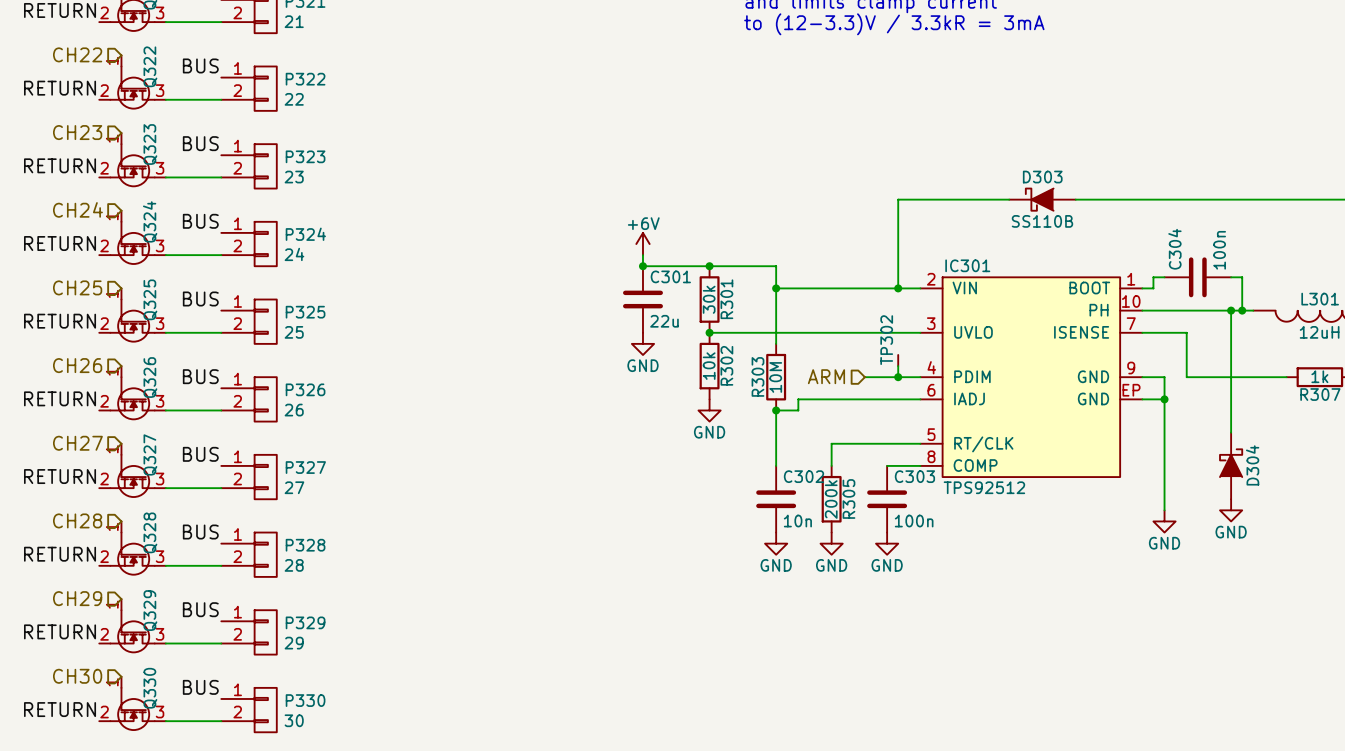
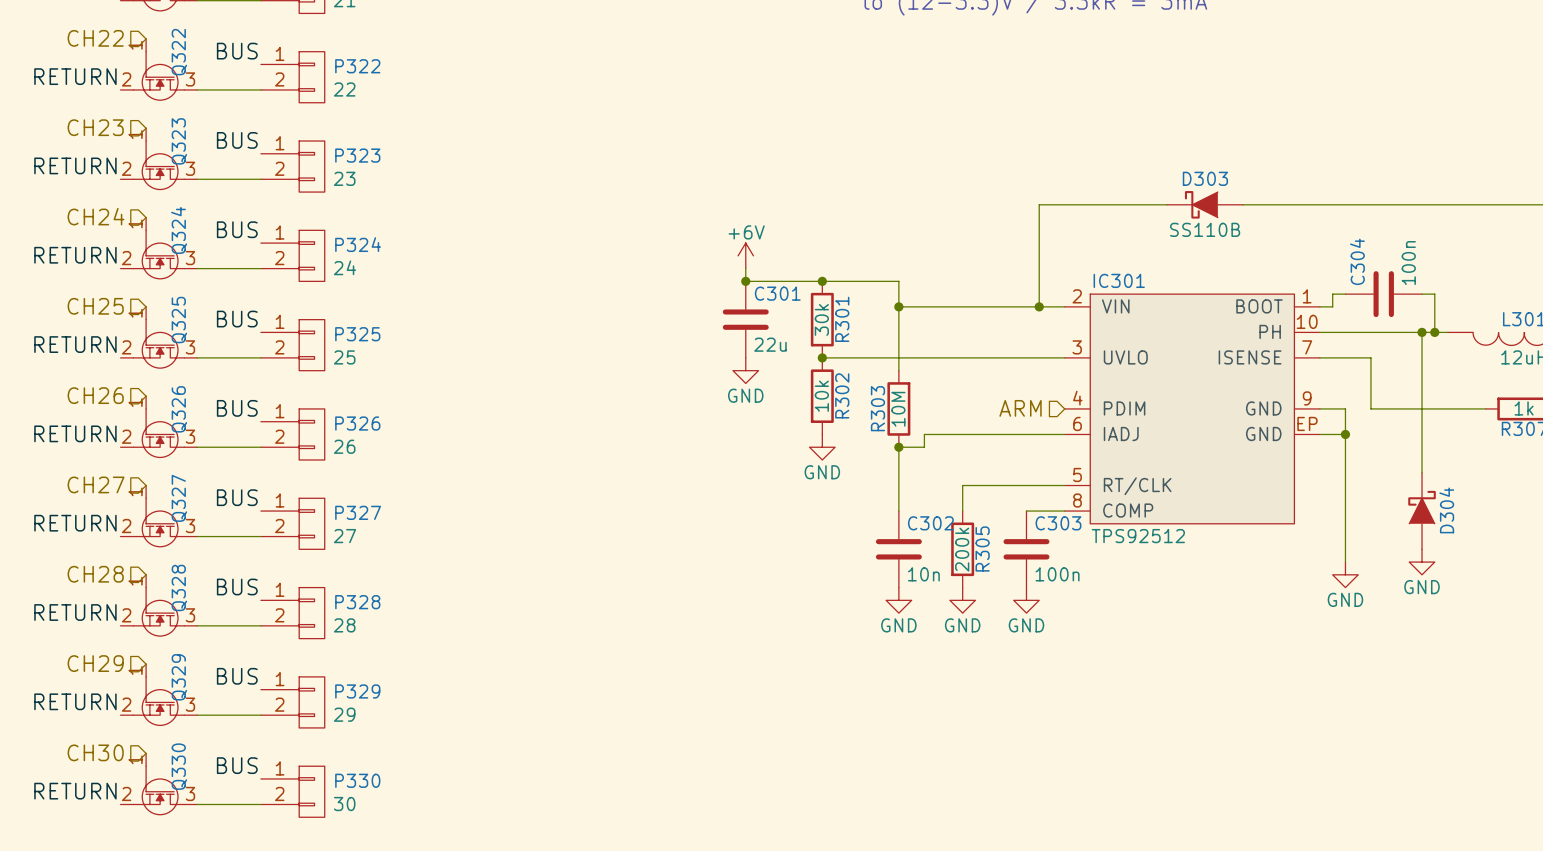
TP302: (898, 358) -> none
wire: (898, 366) (898, 377) -> none
hierarchical label position: ARM (826, 376) -> ARM (1020, 408)
wire: (864, 377) (920, 377) -> none
junction: (898, 377) -> none

